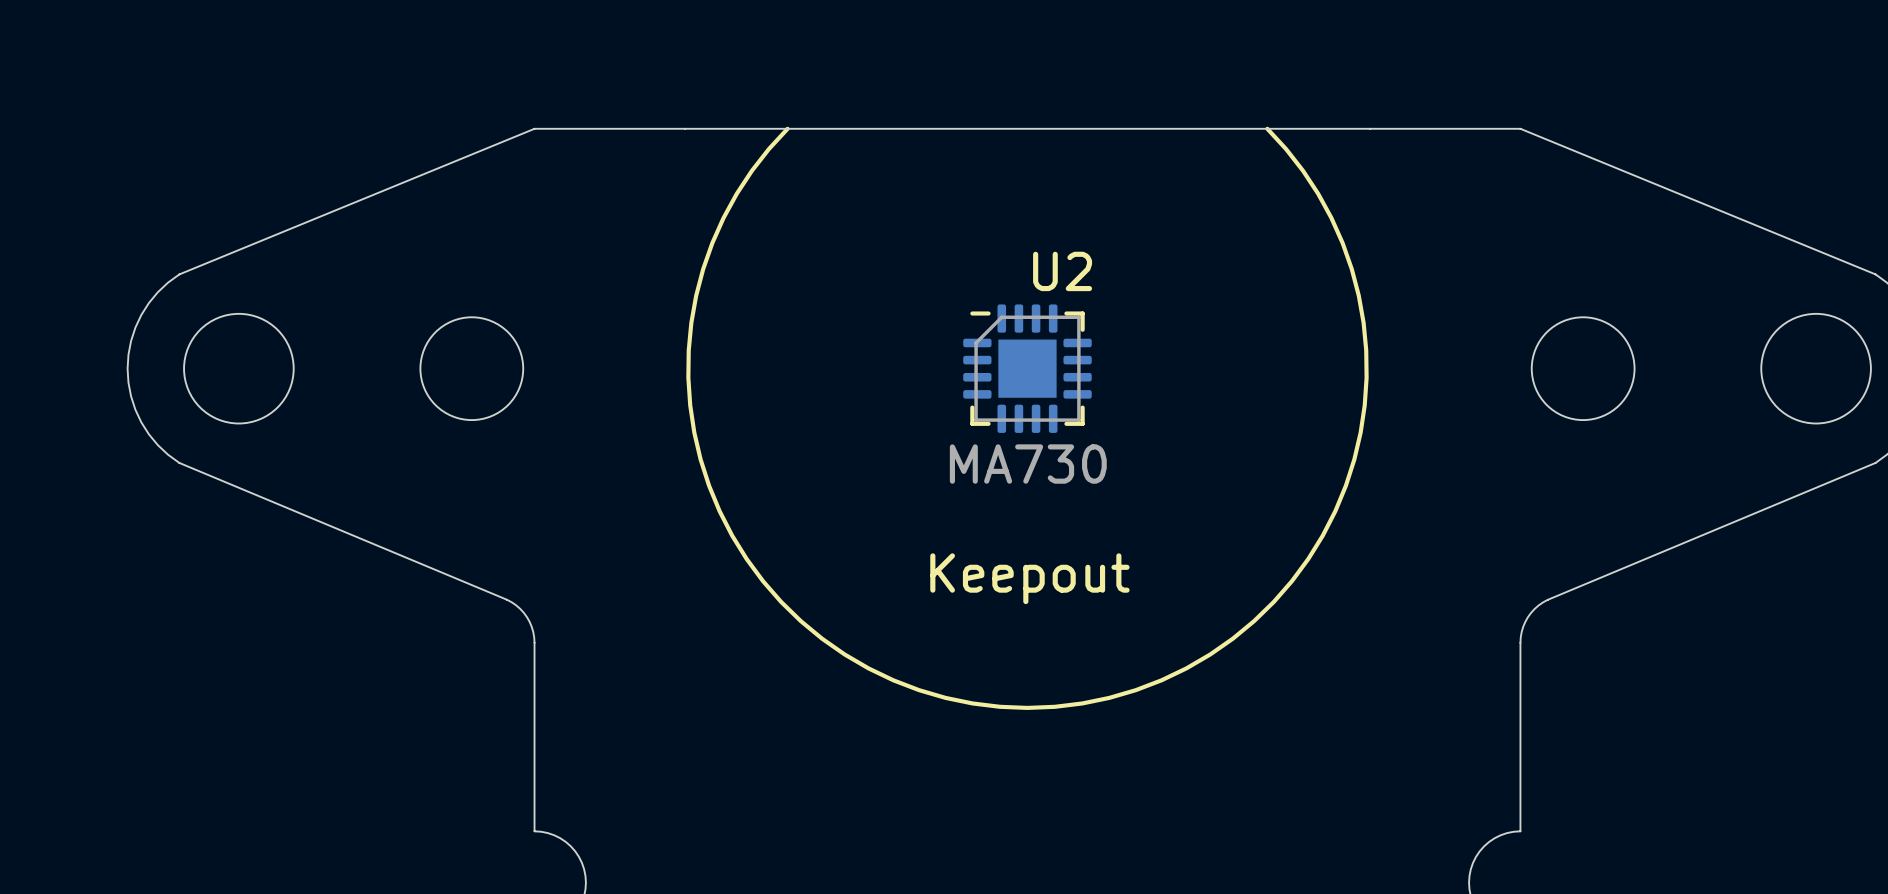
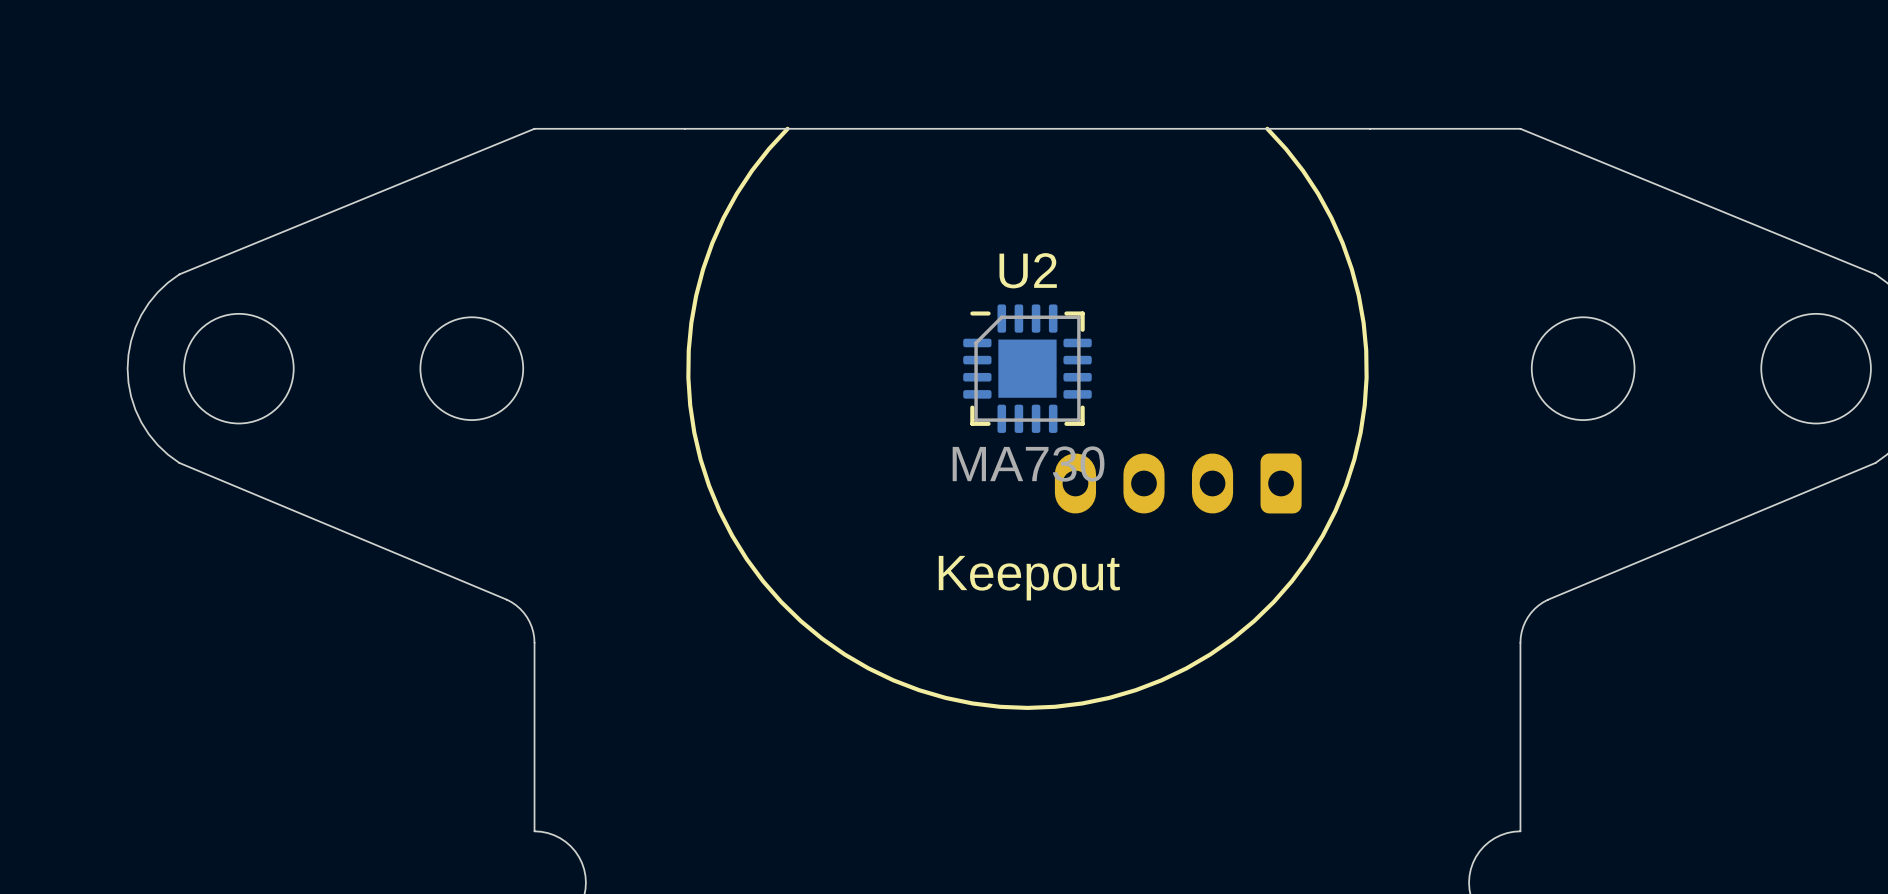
U2 name position: U2 (1062, 271) -> U2 (1028, 270)
part: none -> (1178, 483)

